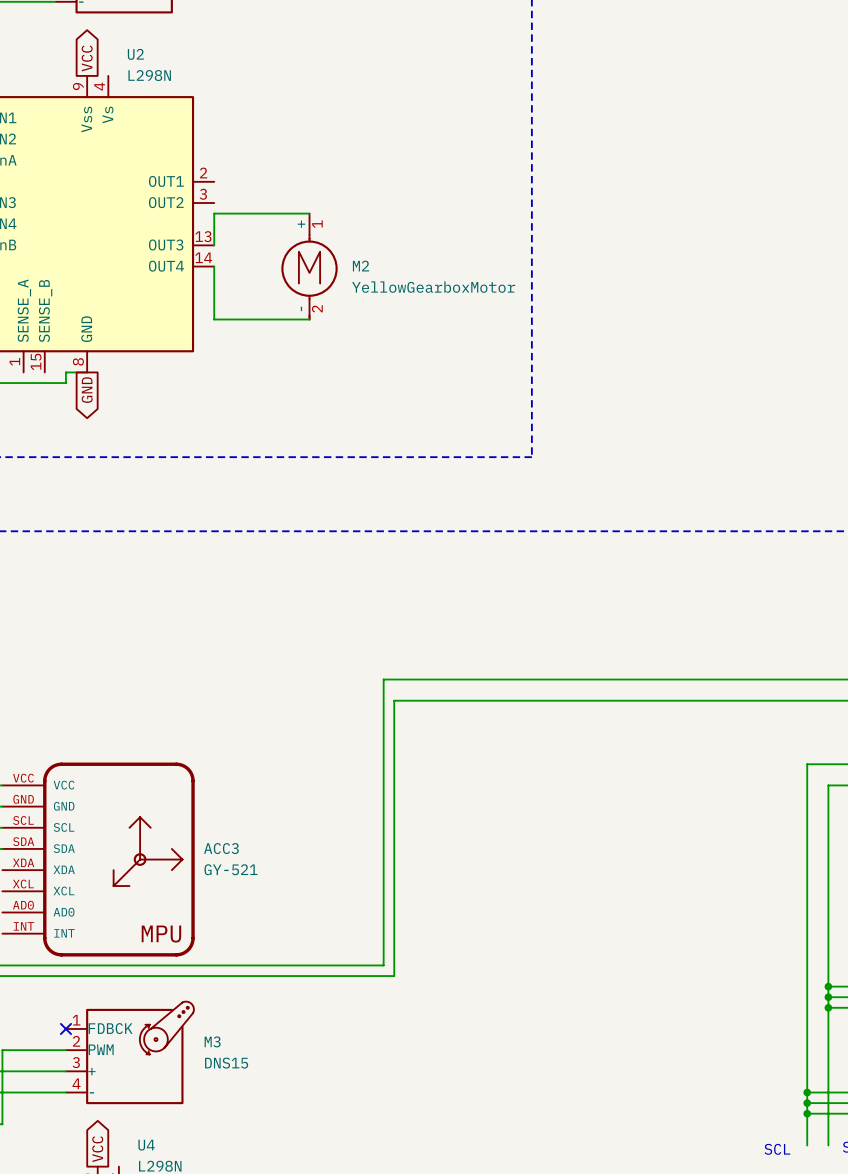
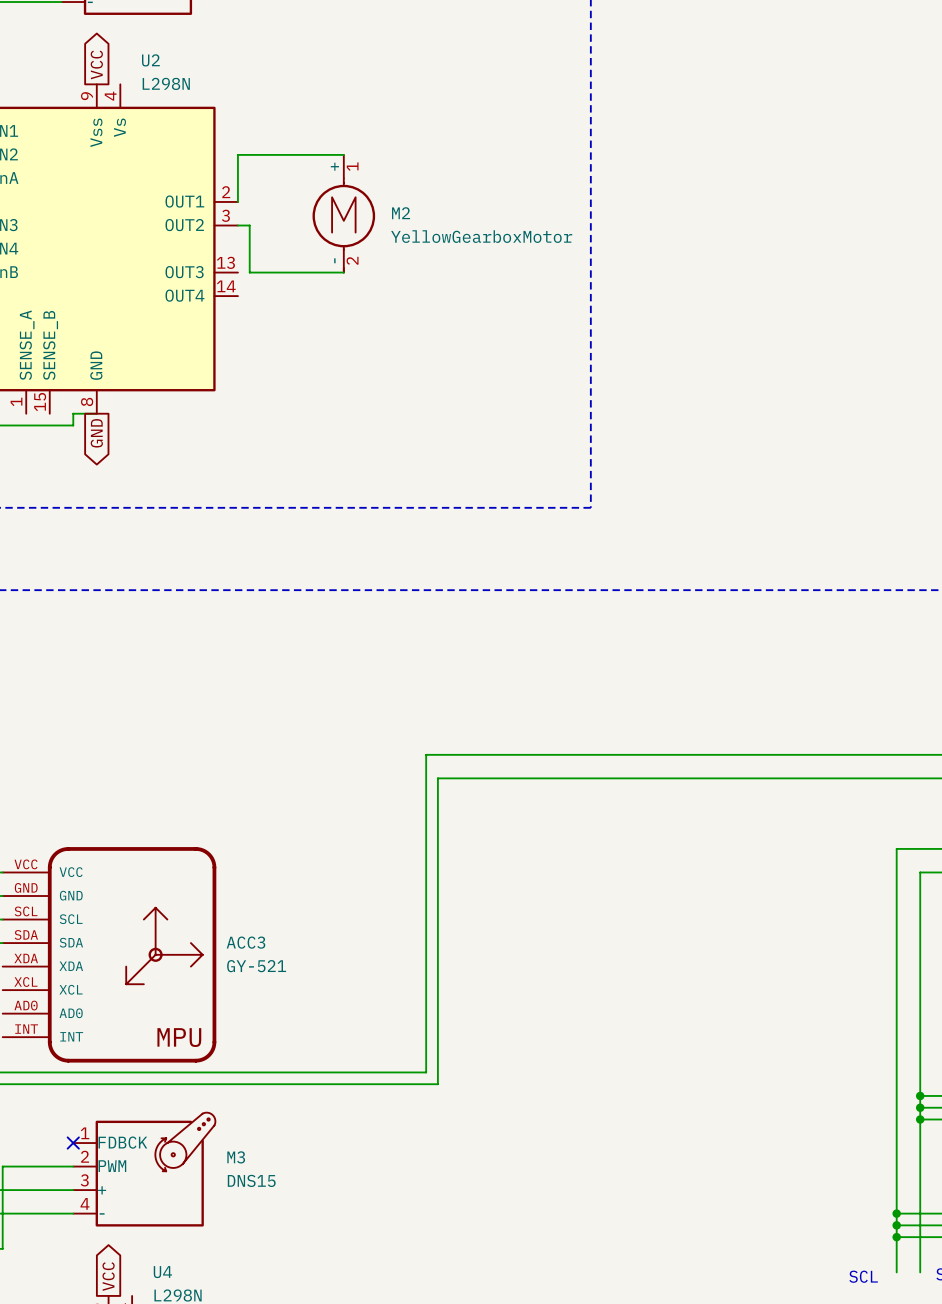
wire: none -> (343, 154) (237, 154) (237, 201)
wire: none -> (237, 225) (249, 225) (249, 272) (343, 272)
wire: (309, 213) (214, 213) (214, 245) -> none
wire: (214, 266) (214, 319) (309, 319) -> none
M2 position: (309, 266) -> (343, 213)

